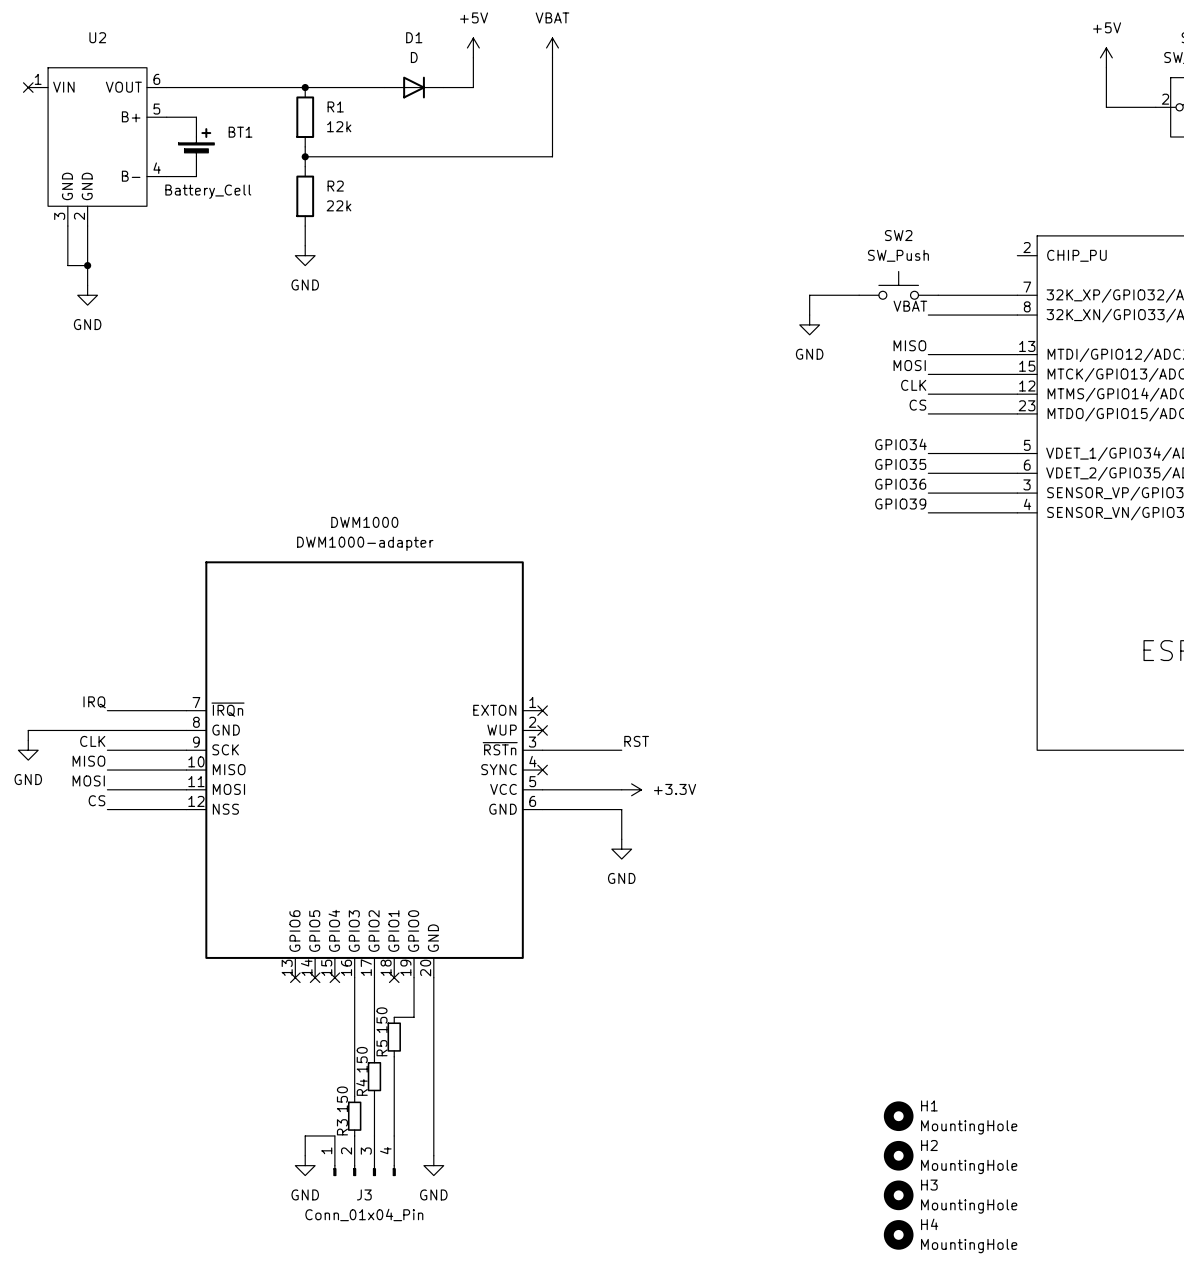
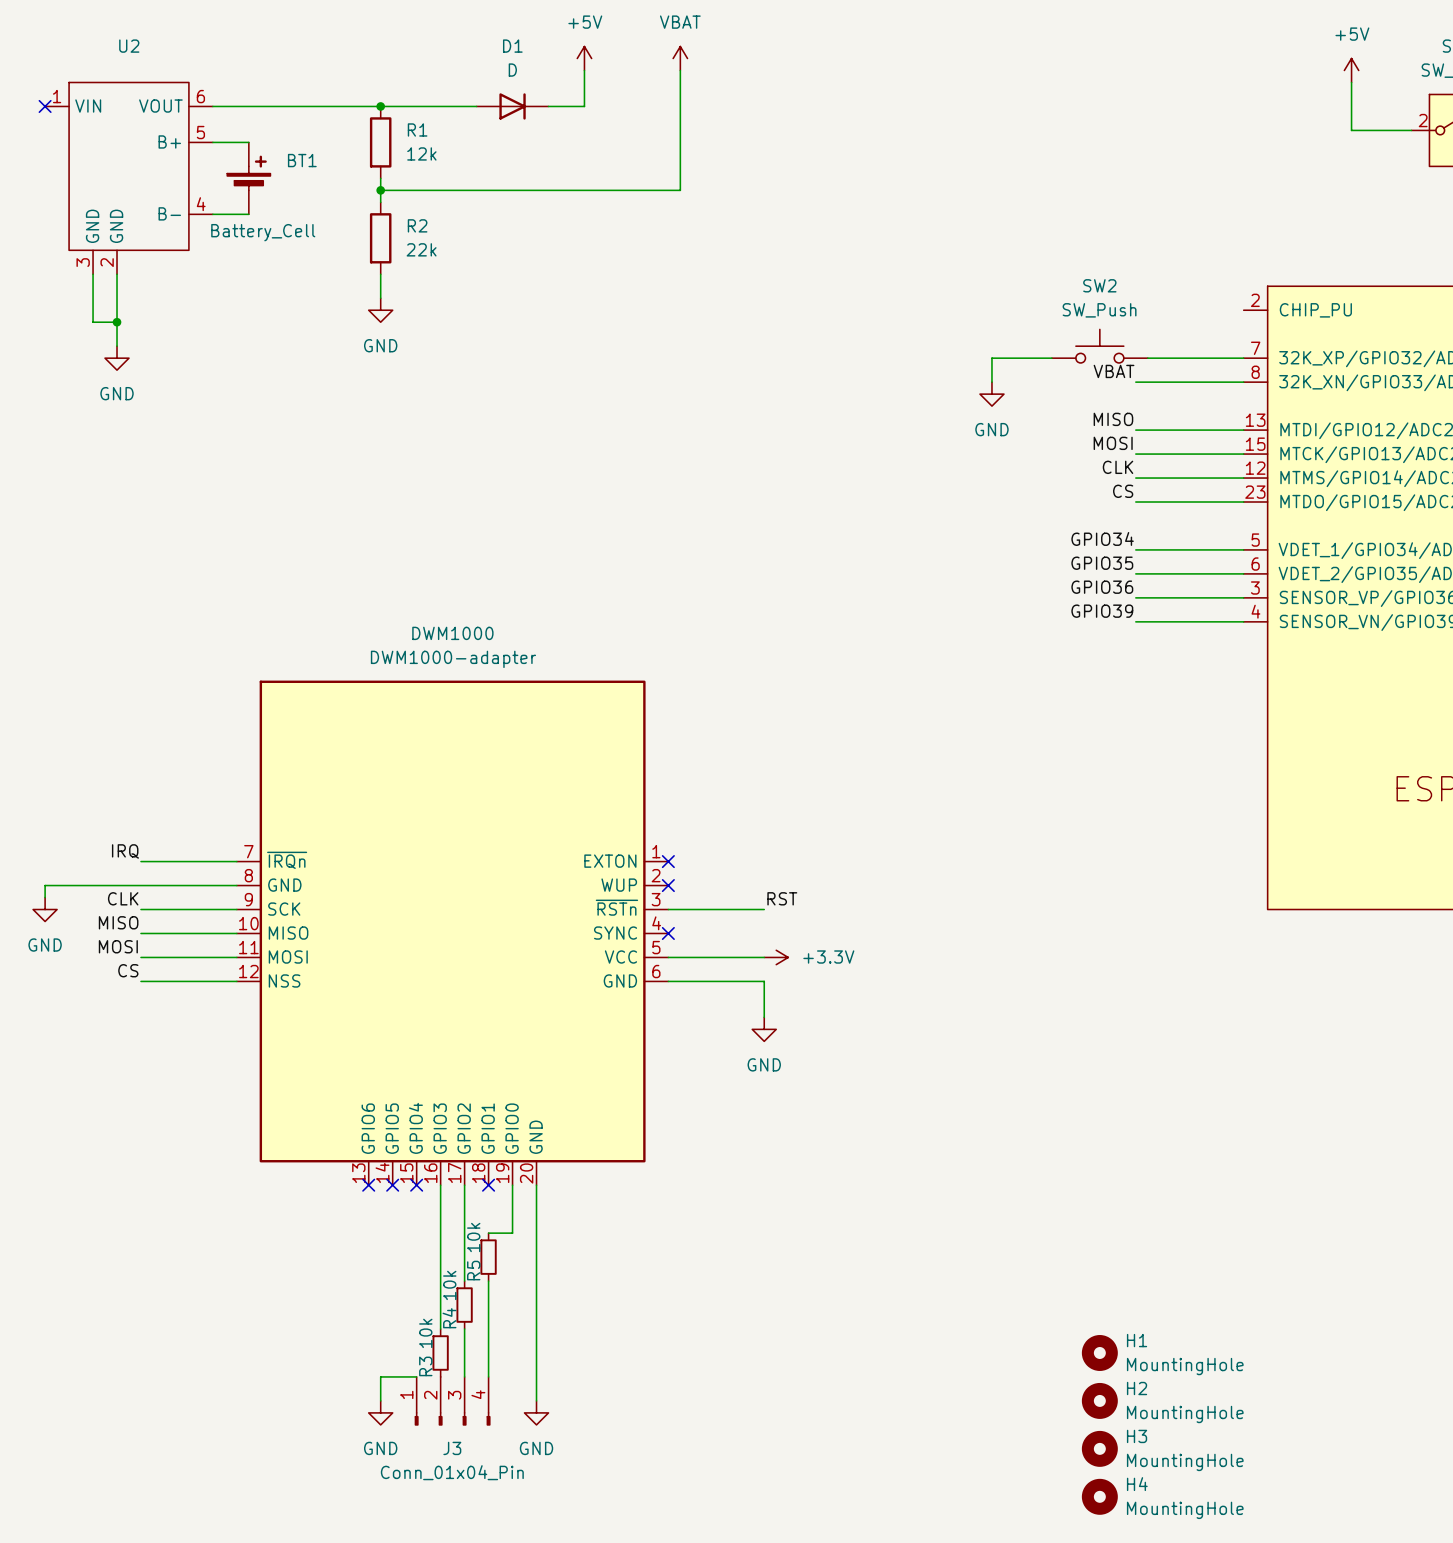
R5 value: 150 (382, 1020) -> 10k (473, 1237)
R4 value: 150 (362, 1059) -> 10k (449, 1285)
R3 value: 150 (342, 1099) -> 10k (425, 1333)

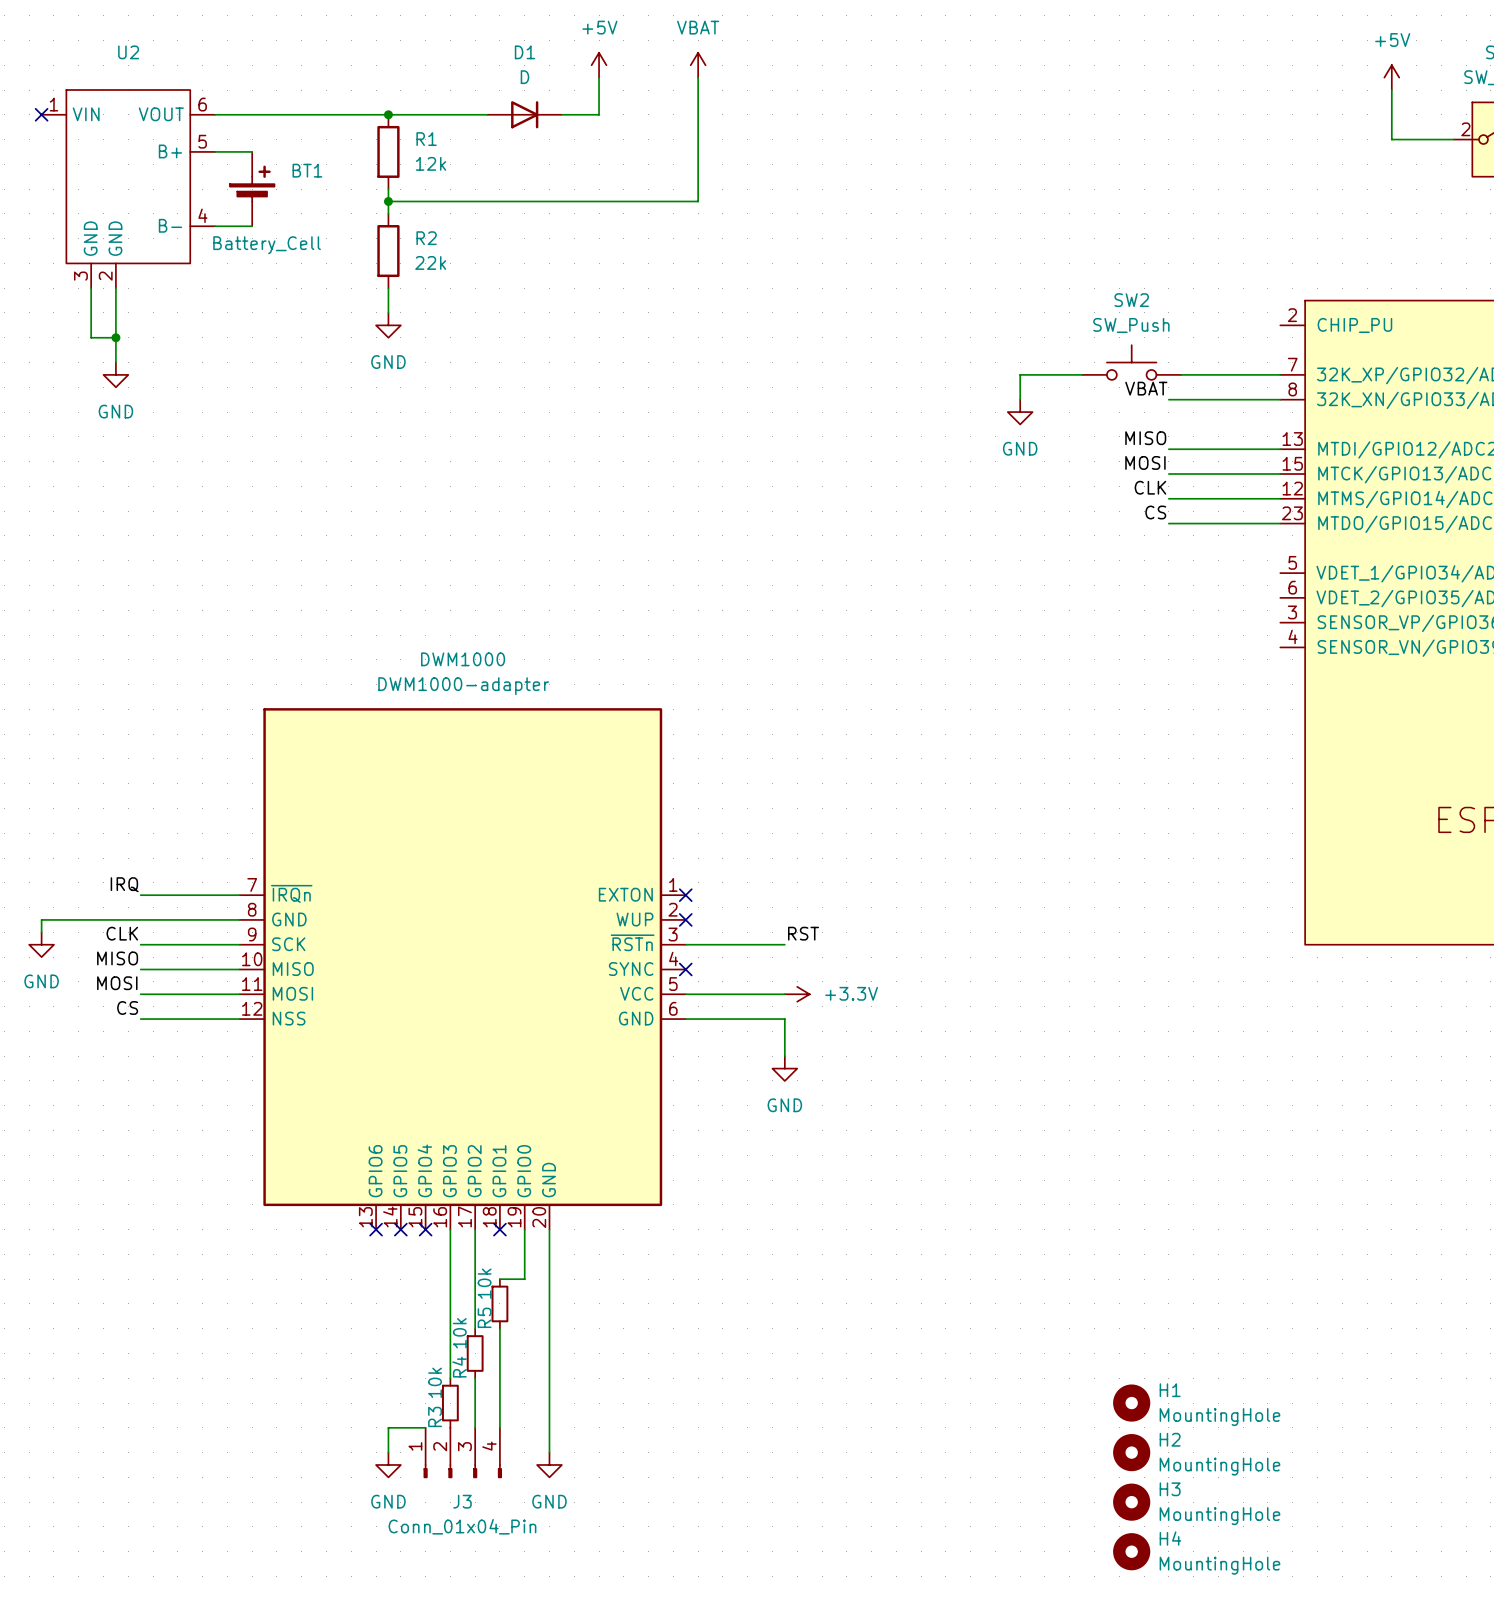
label: GPIO34 (1102, 538) -> none
wire: (1135, 549) (1243, 549) -> none
label: GPIO35 (1102, 563) -> none
wire: (1135, 573) (1243, 573) -> none
label: GPIO36 (1102, 587) -> none
wire: (1135, 597) (1243, 597) -> none
label: GPIO39 (1102, 611) -> none
wire: (1135, 621) (1243, 621) -> none

